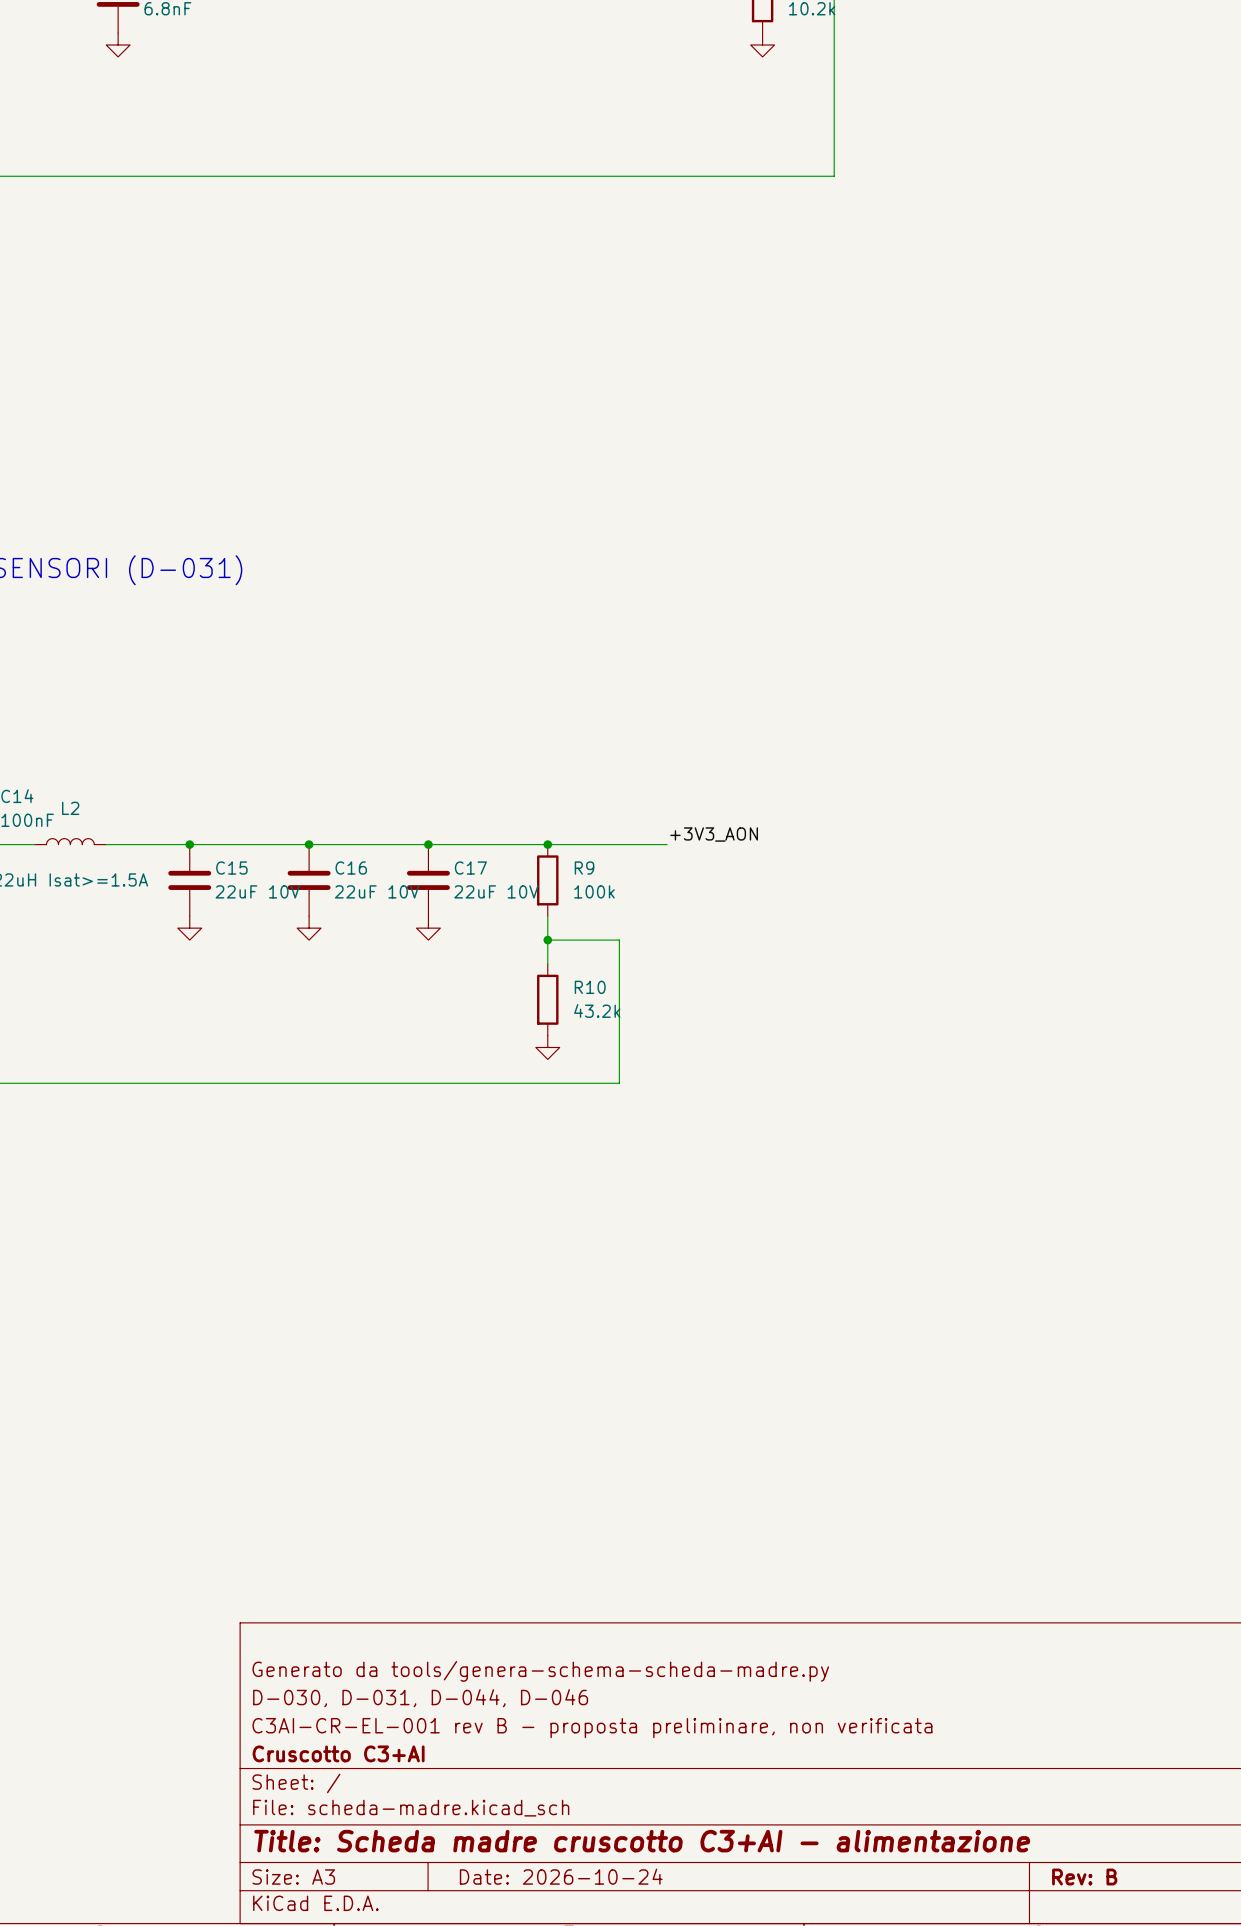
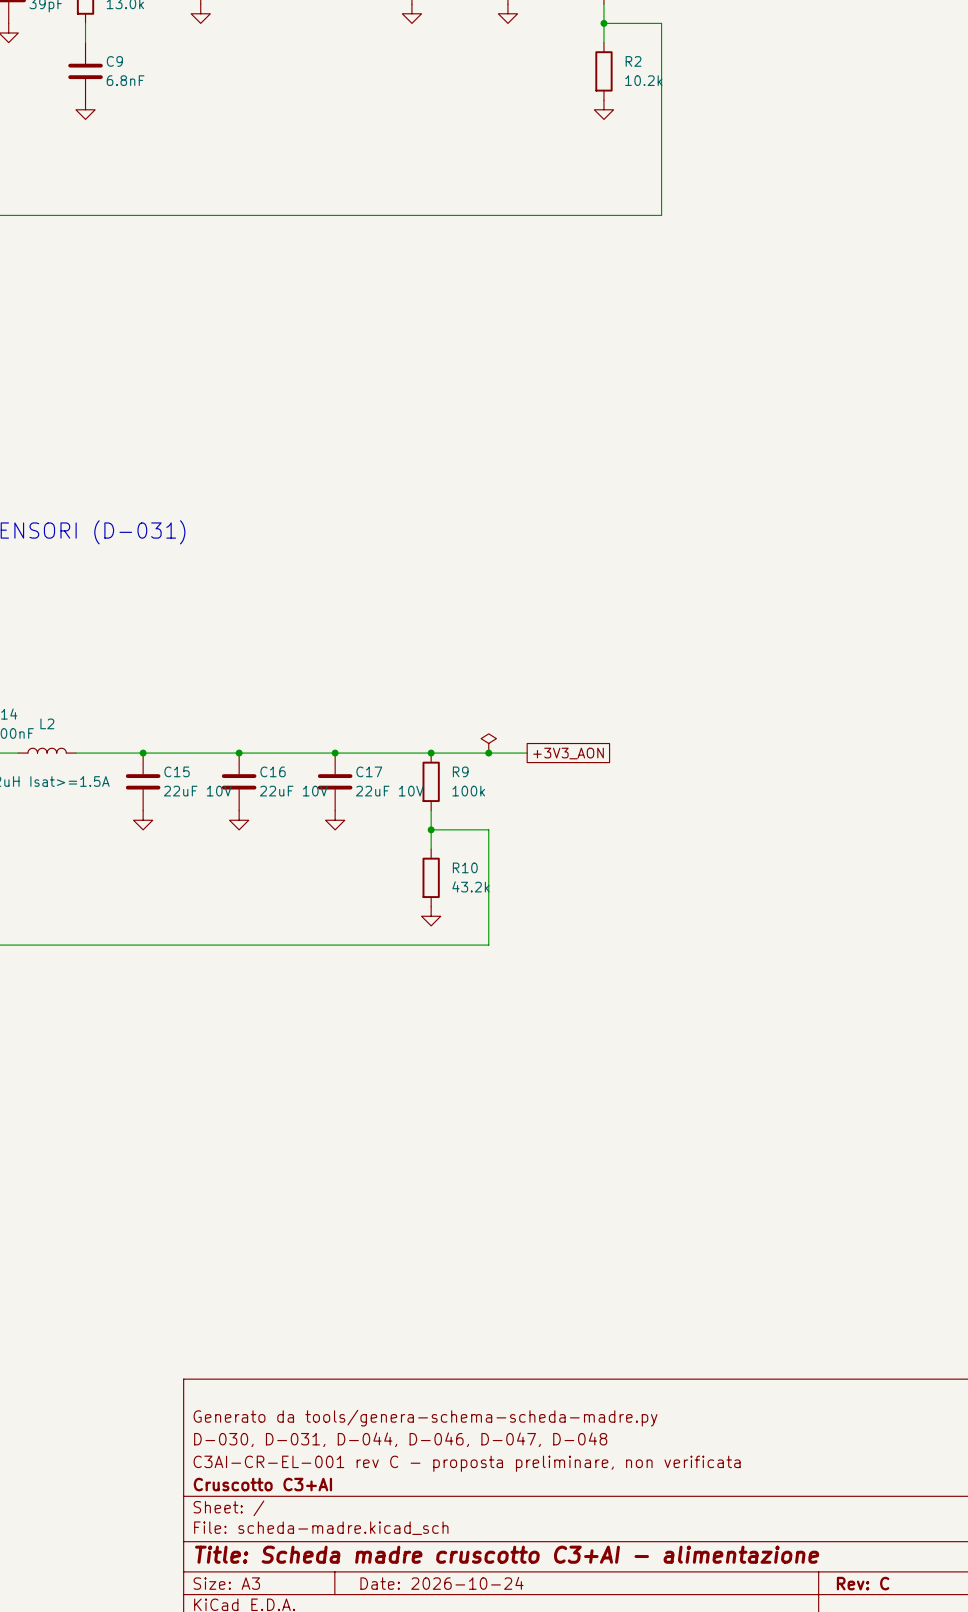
power symbol: none -> (488, 743)
label: +3V3_AON (714, 834) -> none
junction: none -> (488, 753)
global label: none -> +3V3_AON (568, 753)
title block: D-030, D-031, D-044, D-046 (420, 1698) -> D-030, D-031, D-044, D-046, D-047, D-048 (400, 1439)
title block: C3AI-CR-EL-001 rev B - proposta preliminare, non verificata (592, 1728) -> C3AI-CR-EL-001 rev C - proposta preliminare, non verificata (467, 1463)
title block: Rev: B (1084, 1877) -> Rev: C (863, 1583)

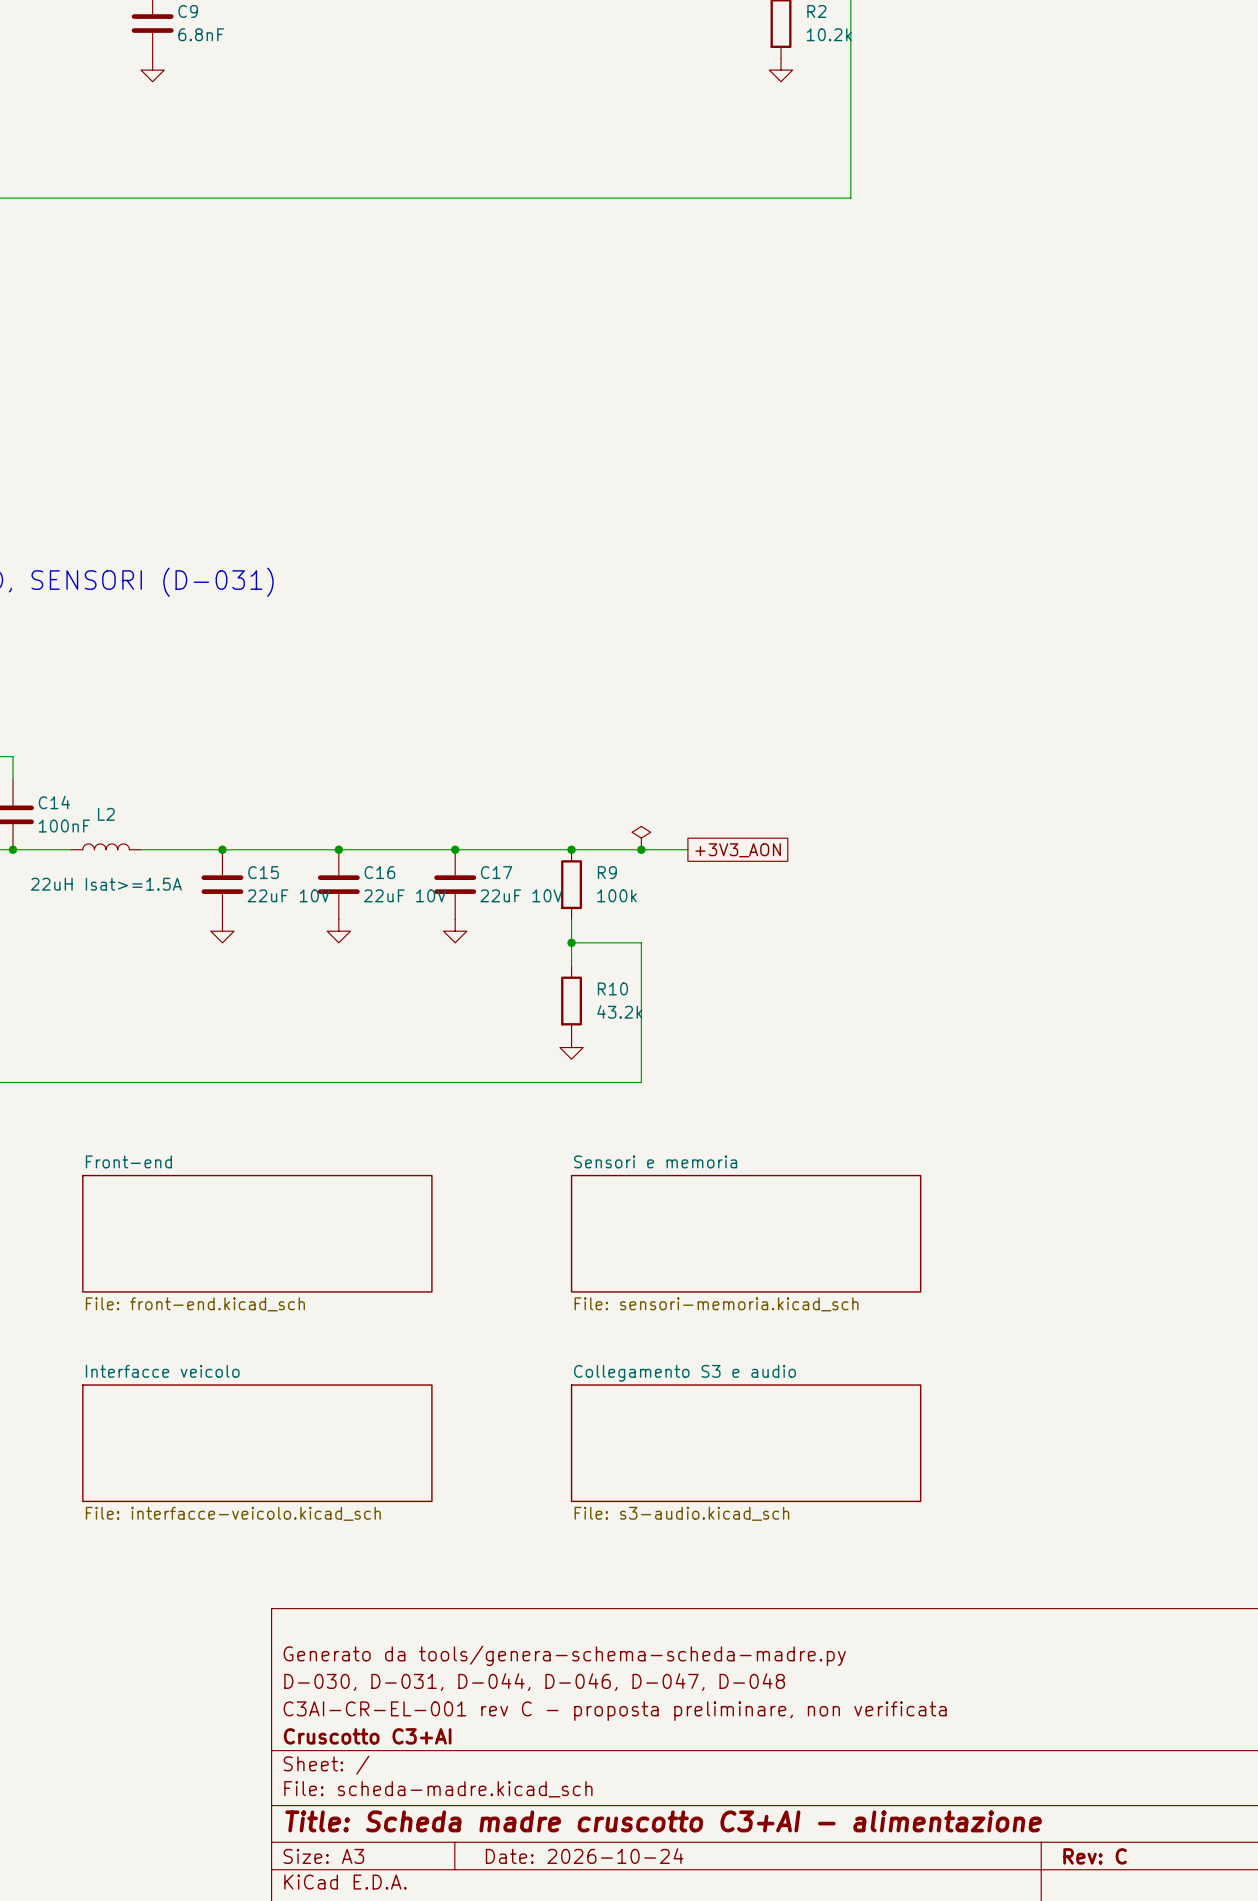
sheet Front-end: none -> File: front-end.kicad_sch (257, 1233)
sheet Sensori e memoria: none -> File: sensori-memoria.kicad_sch (746, 1233)
sheet Interfacce veicolo: none -> File: interfacce-veicolo.kicad_sch (257, 1443)
sheet Collegamento S3 e audio: none -> File: s3-audio.kicad_sch (746, 1443)

